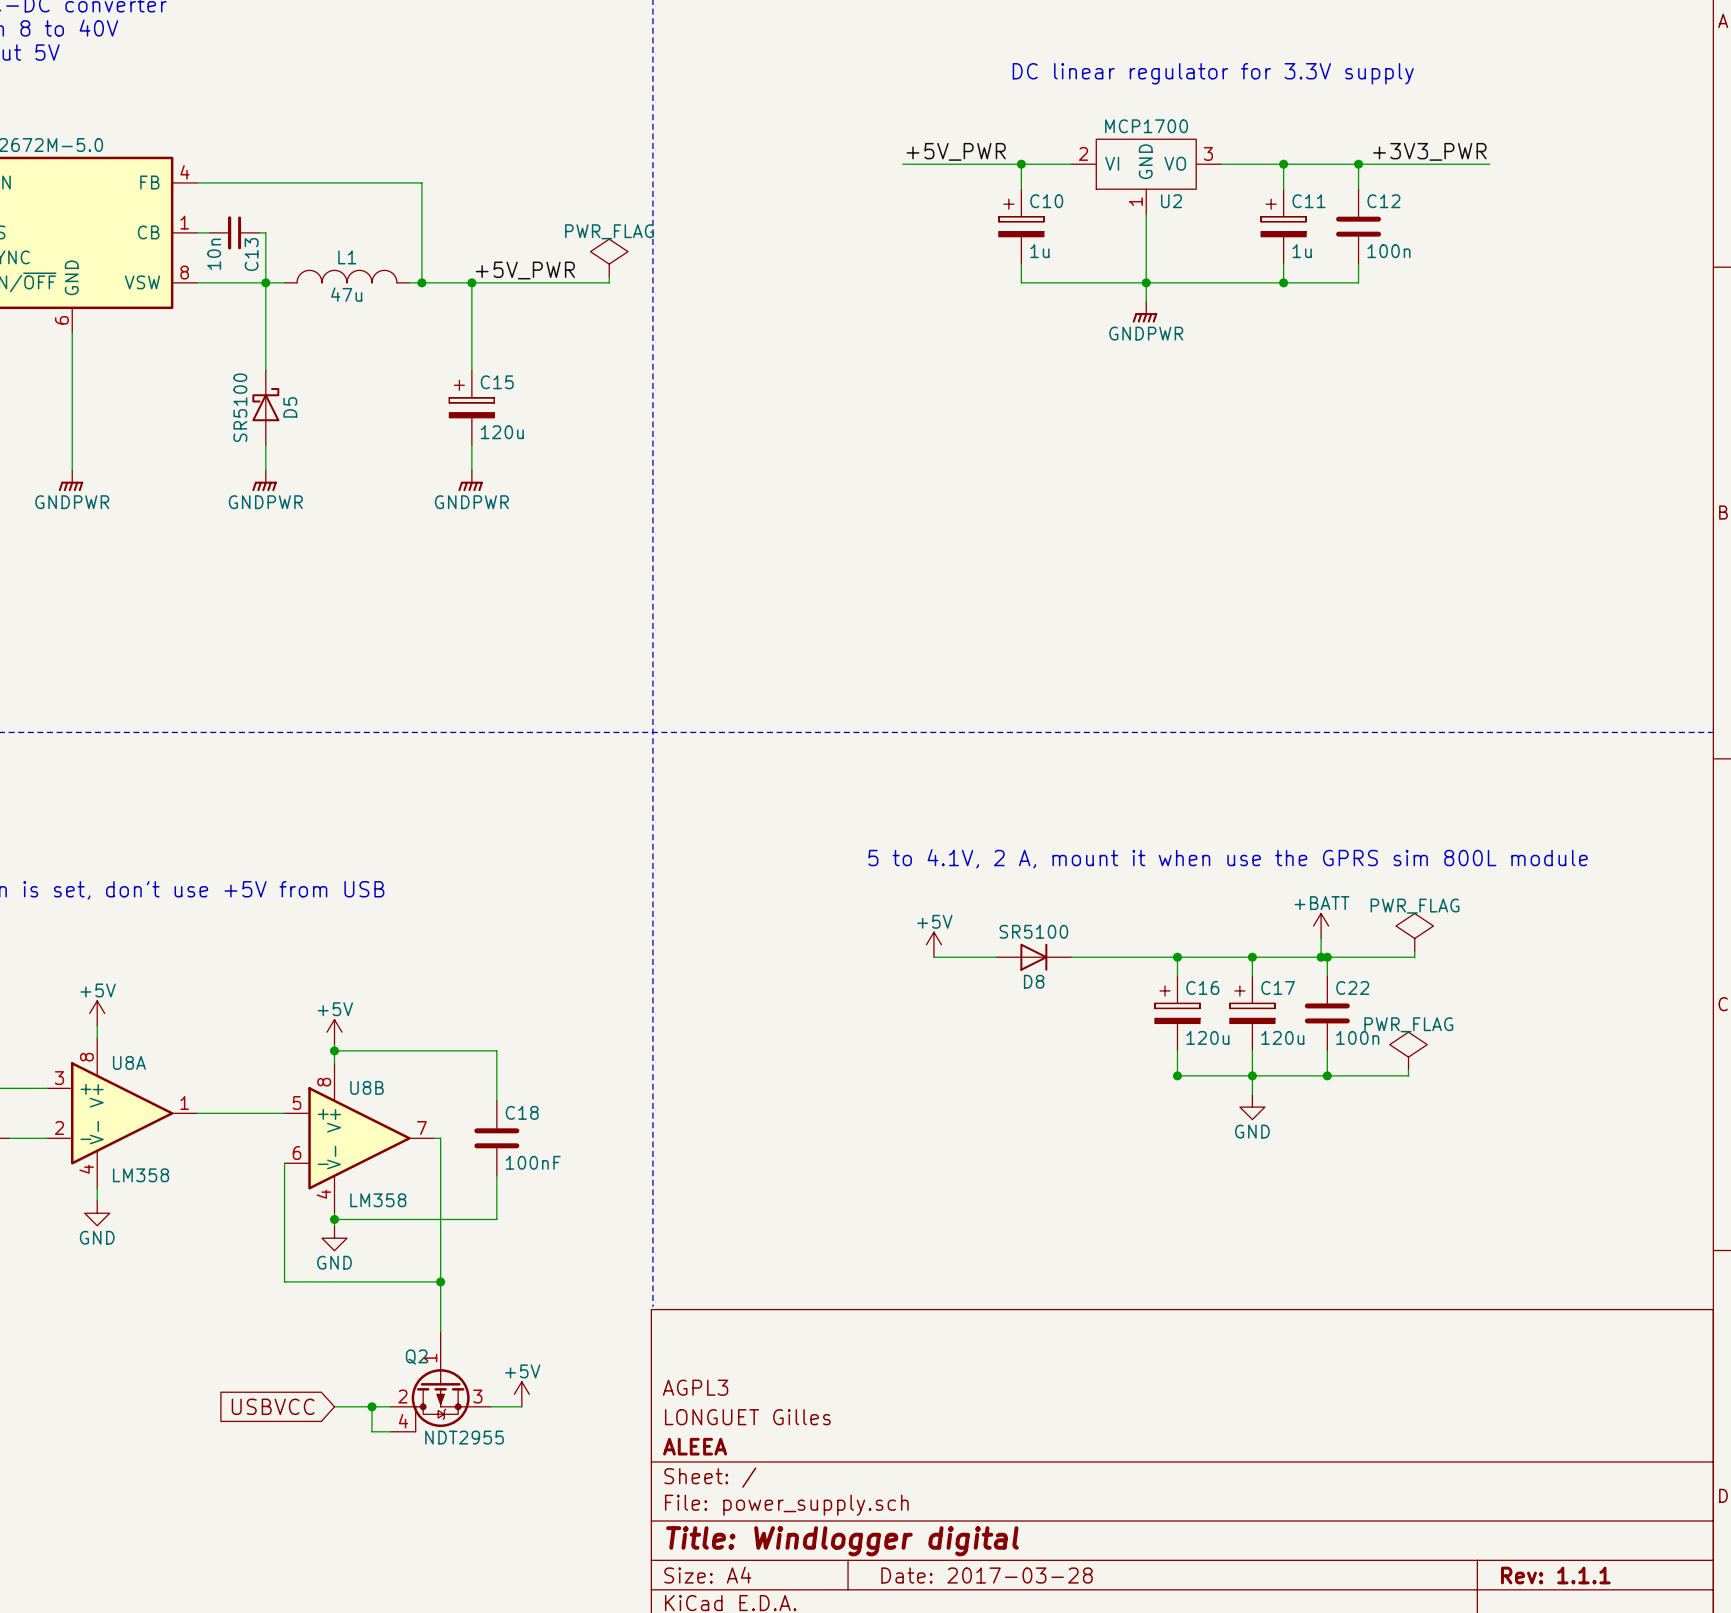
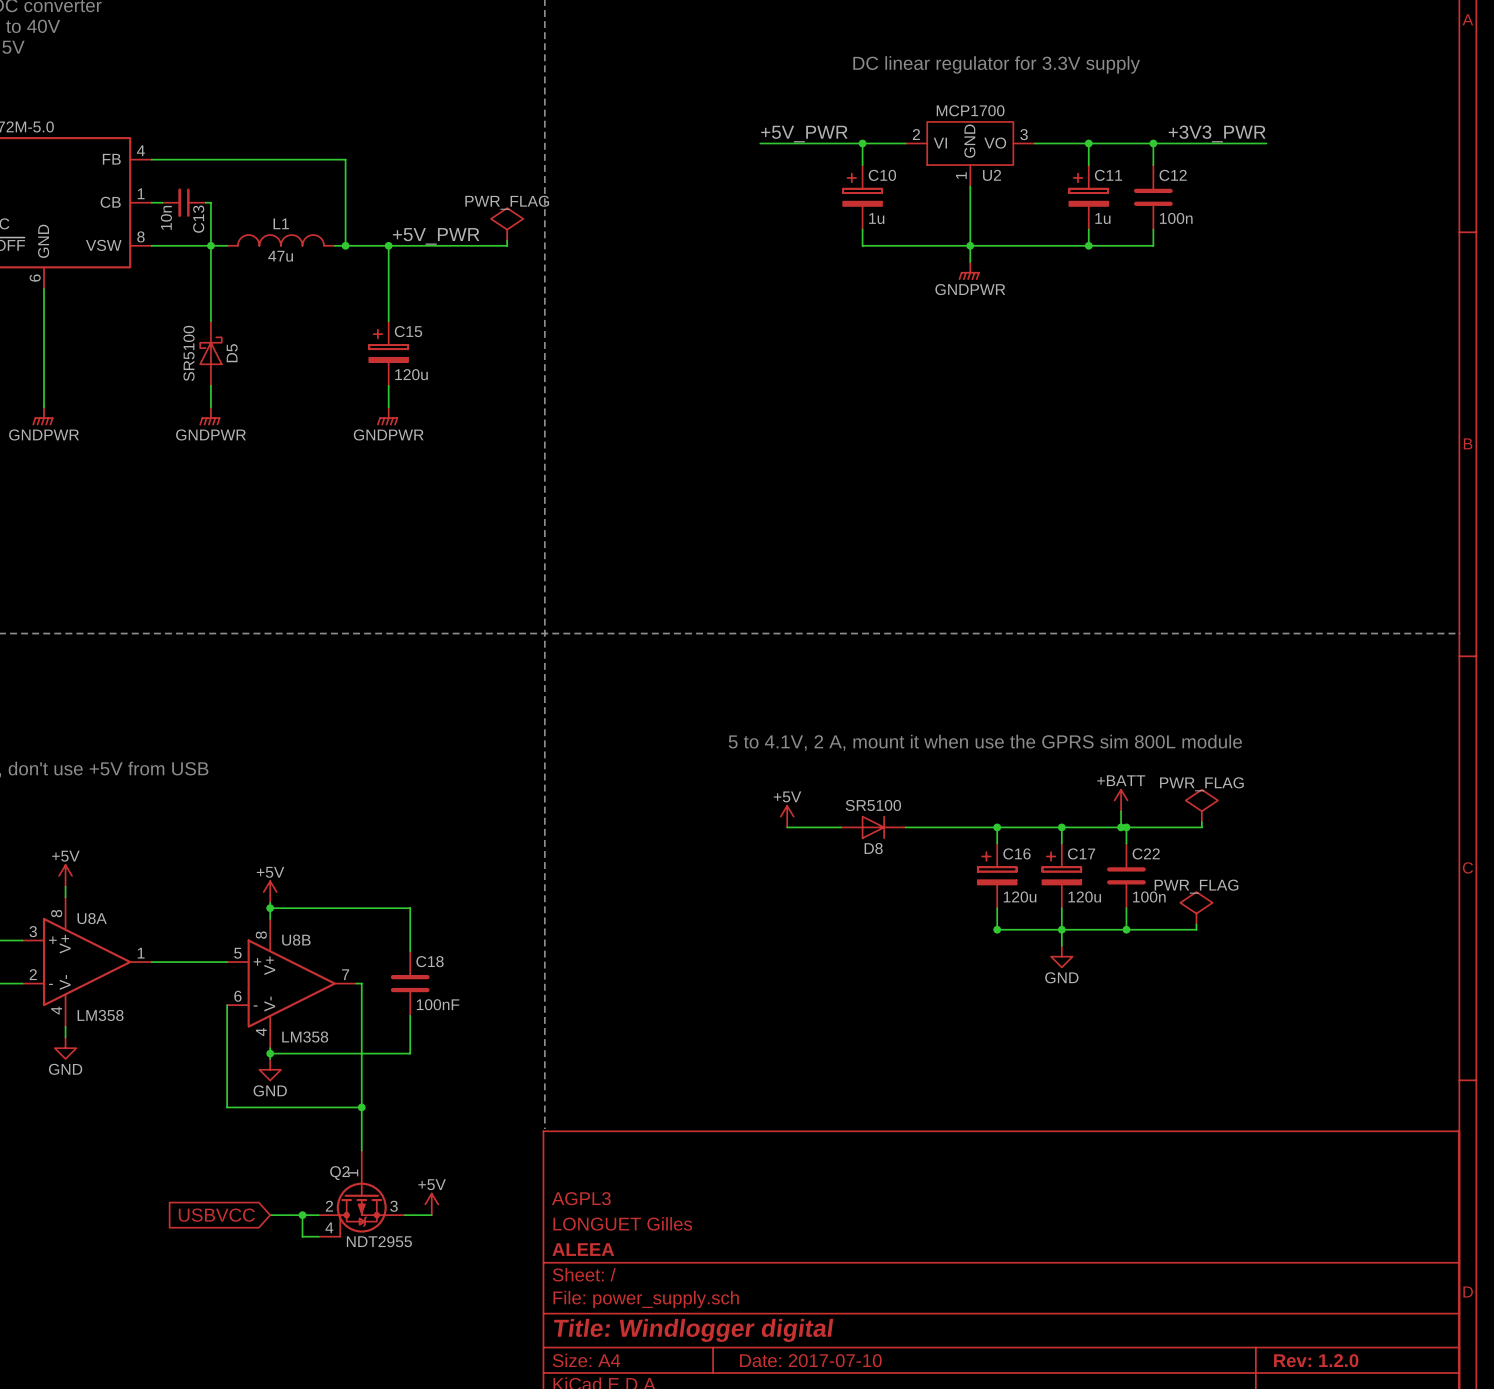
title block: Date: 2017-03-28 (987, 1575) -> Date: 2017-07-10 (810, 1360)
title block: Rev: 1.1.1 (1555, 1575) -> Rev: 1.2.0 (1316, 1360)

